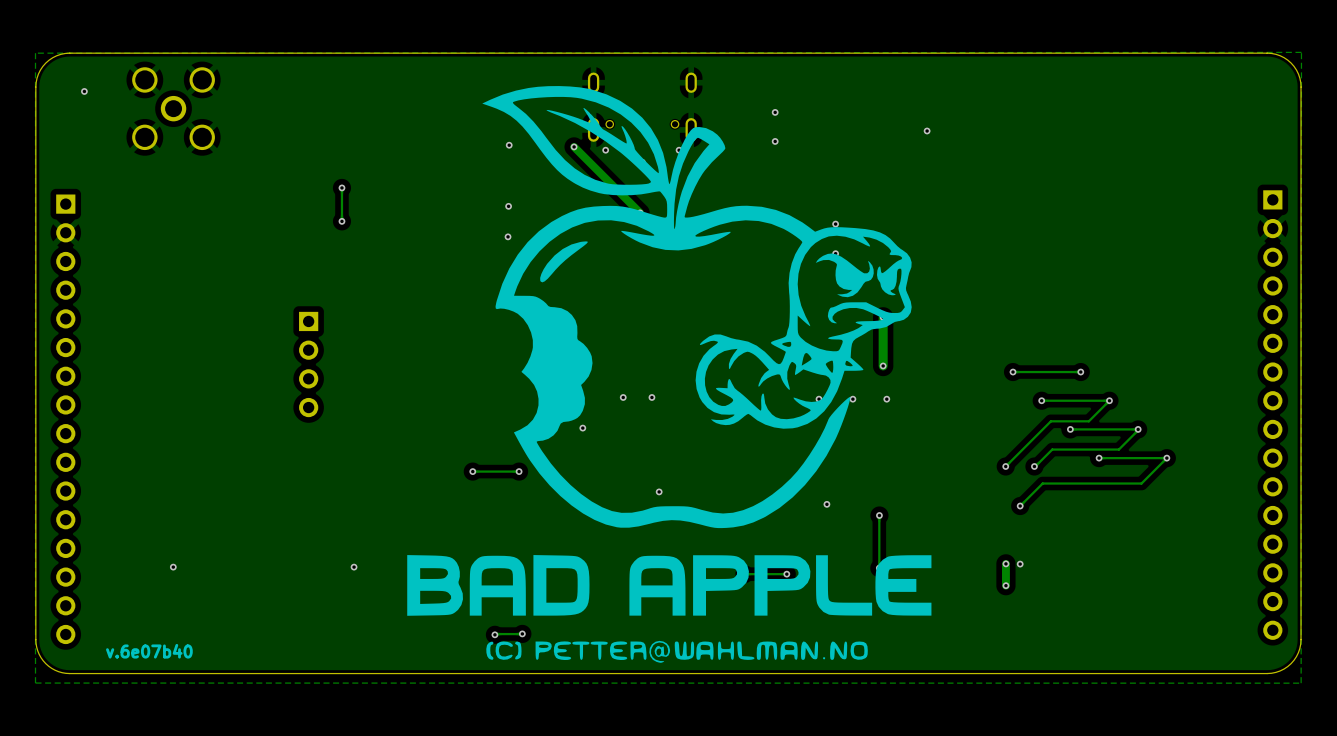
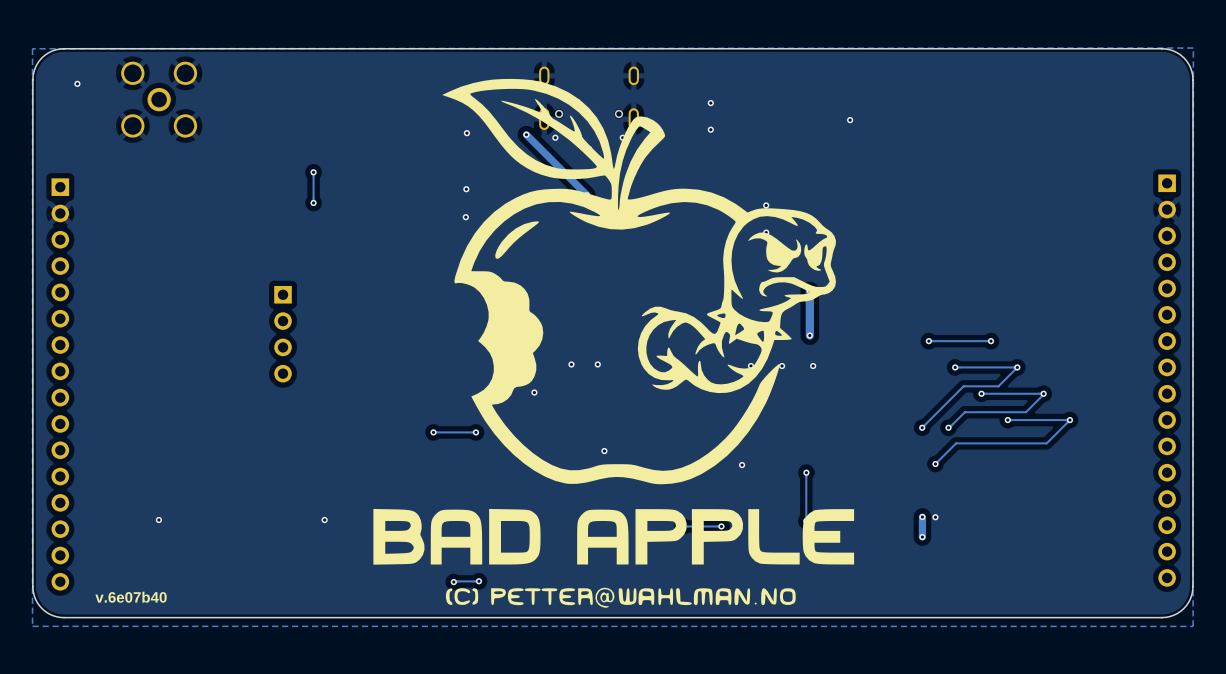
via position: (826, 504) -> (742, 465)

